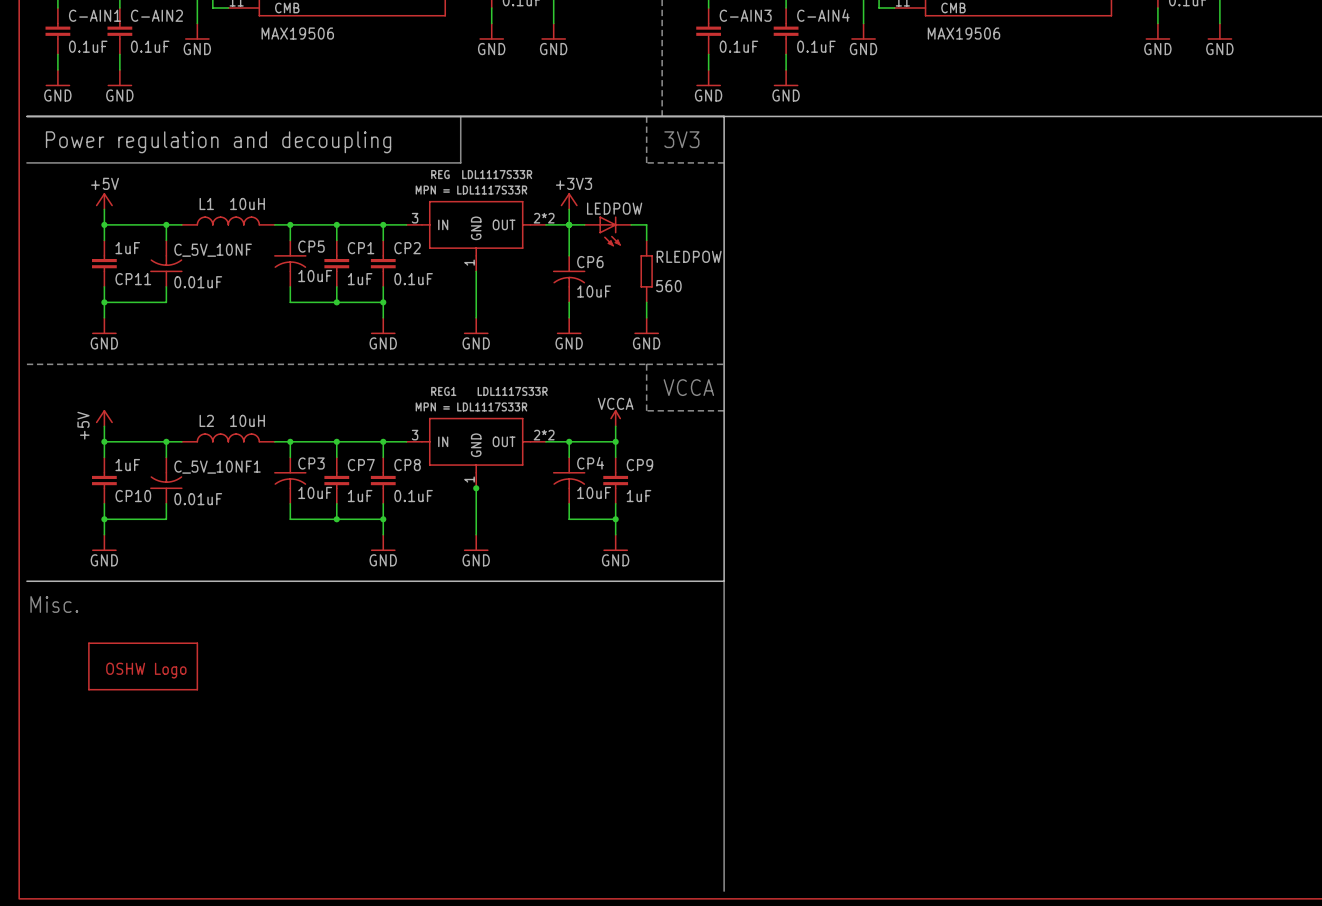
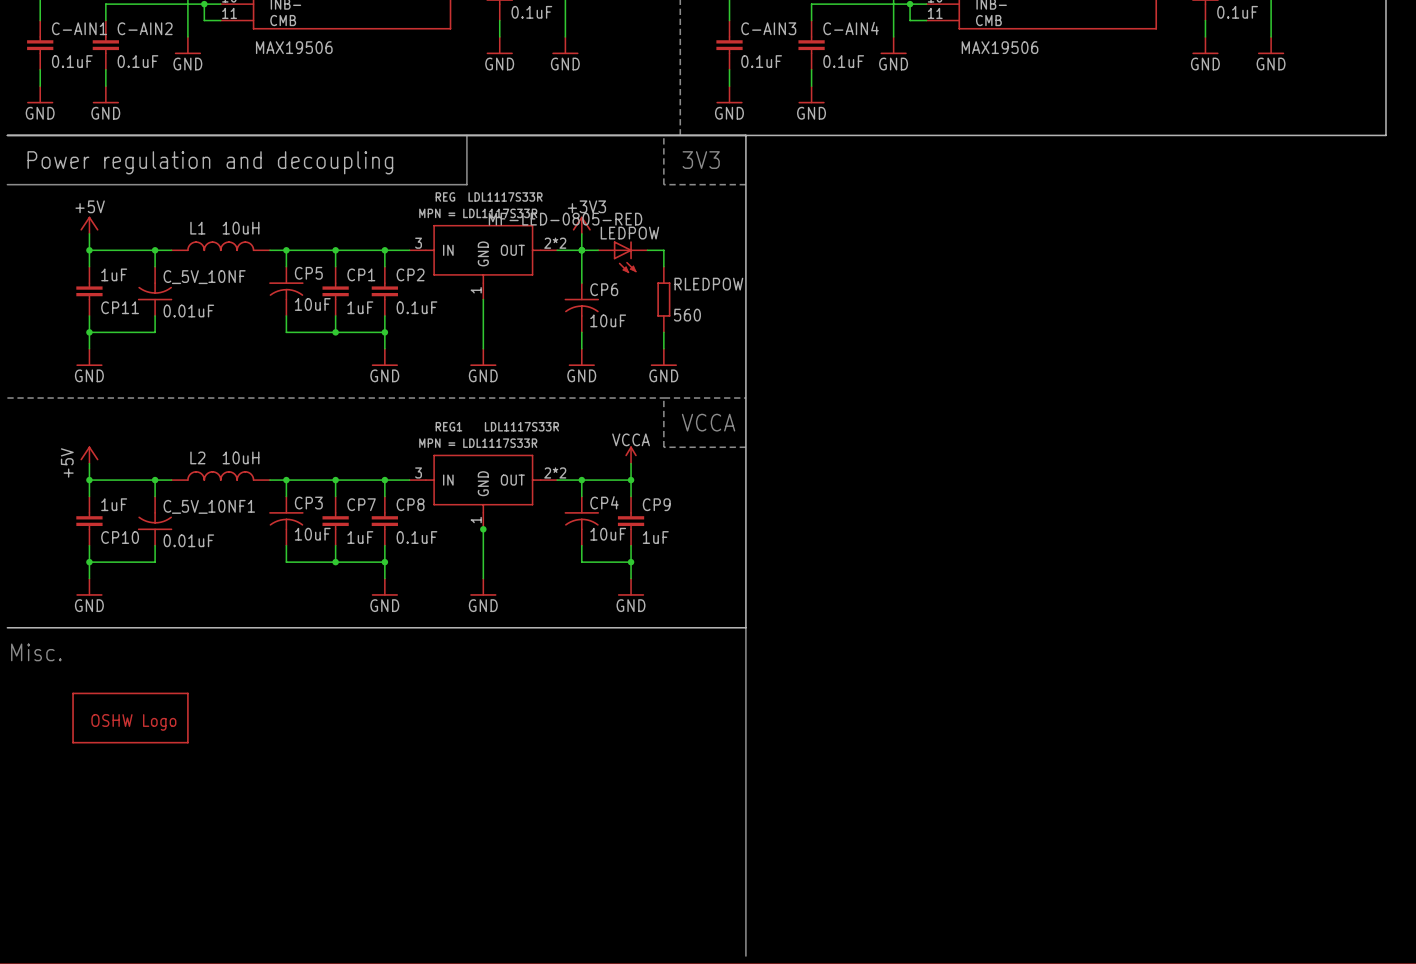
LEDPOW value: none -> MF-LED-0805-RED (565, 219)

